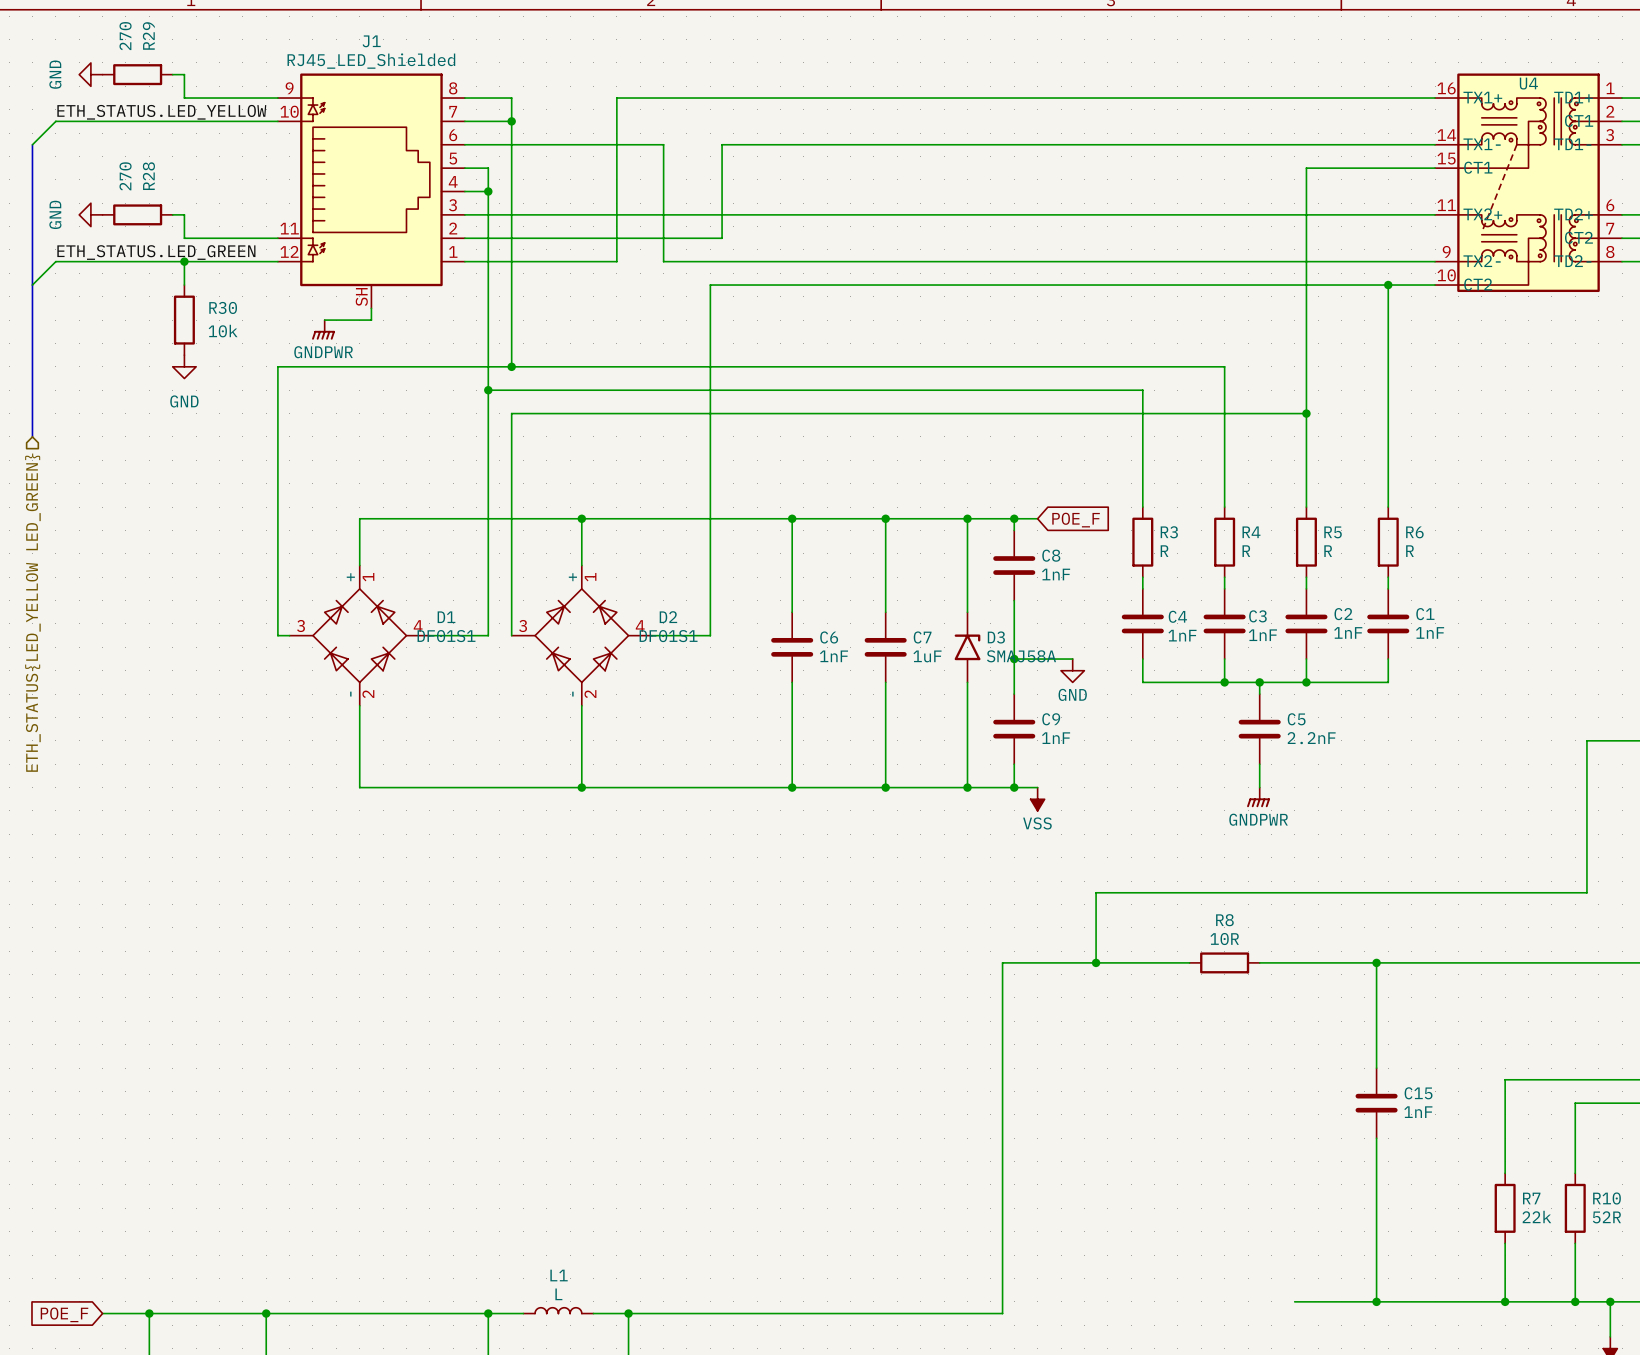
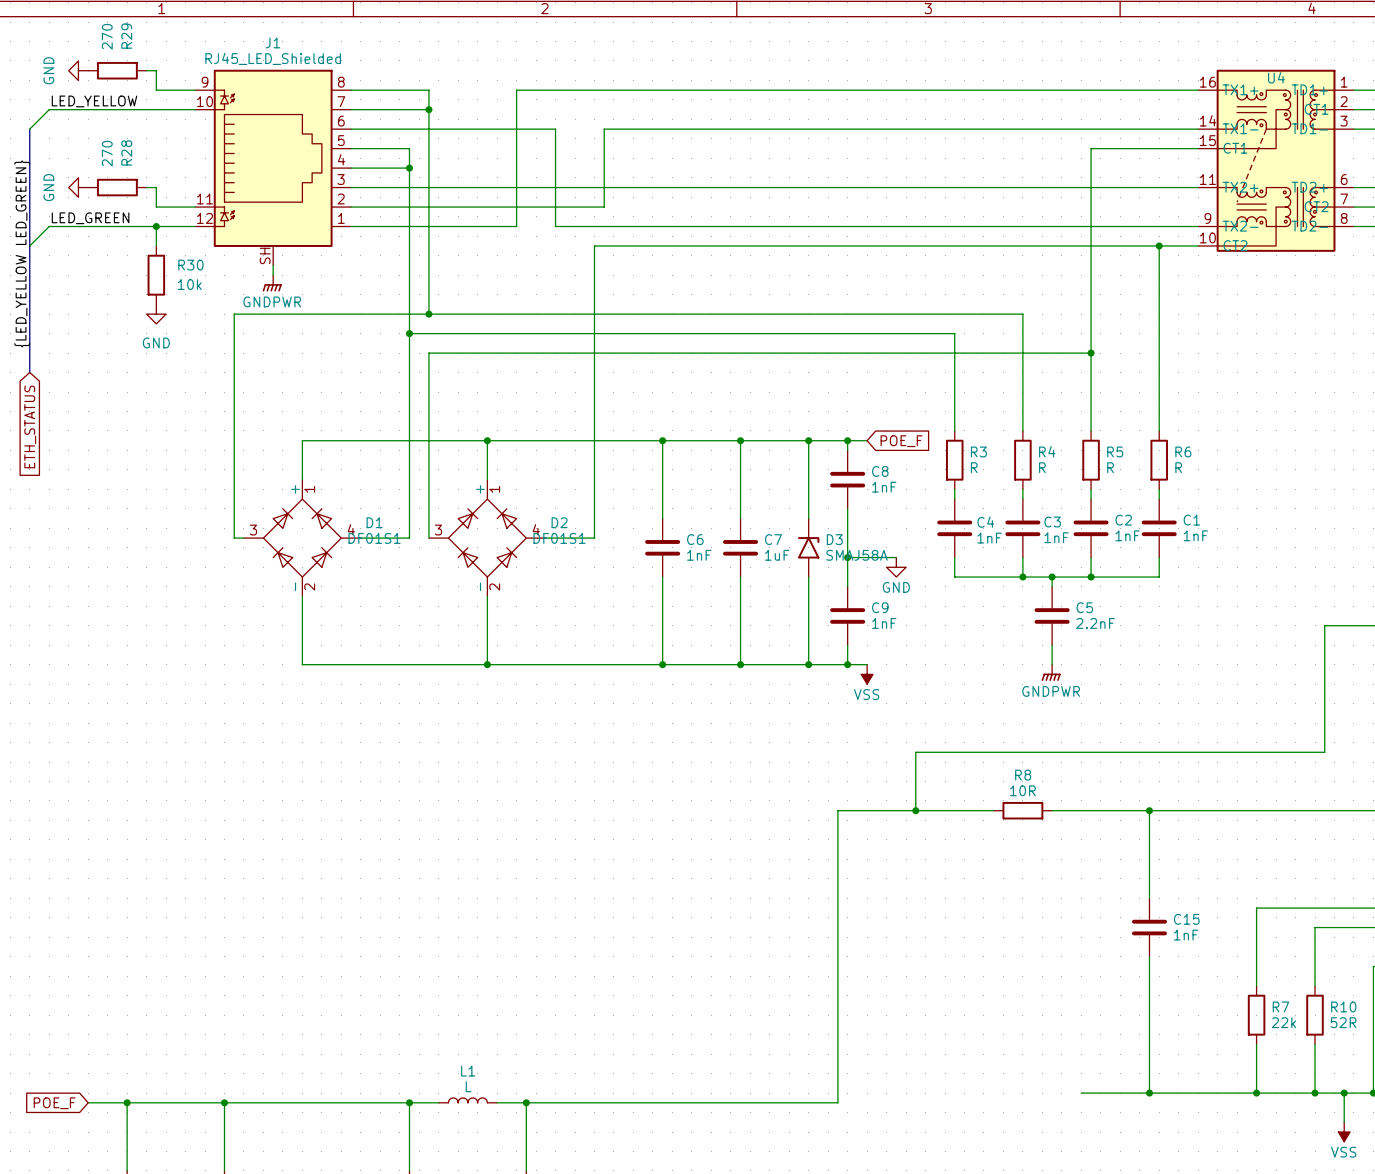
label: ETH_STATUS.LED_YELLOW (161, 112) -> LED_YELLOW (94, 101)
J1 position: (371, 190) -> (273, 167)
label: ETH_STATUS.LED_GREEN (156, 252) -> LED_GREEN (90, 218)
label: none -> {LED_YELLOW LED_GREEN} (22, 253)
wire: (371, 308) (371, 320) (324, 320) -> (273, 265) (273, 275)
global label: none -> ETH_STATUS (30, 426)
hierarchical label: ETH_STATUS{LED_YELLOW LED_GREEN} (32, 612) -> none

